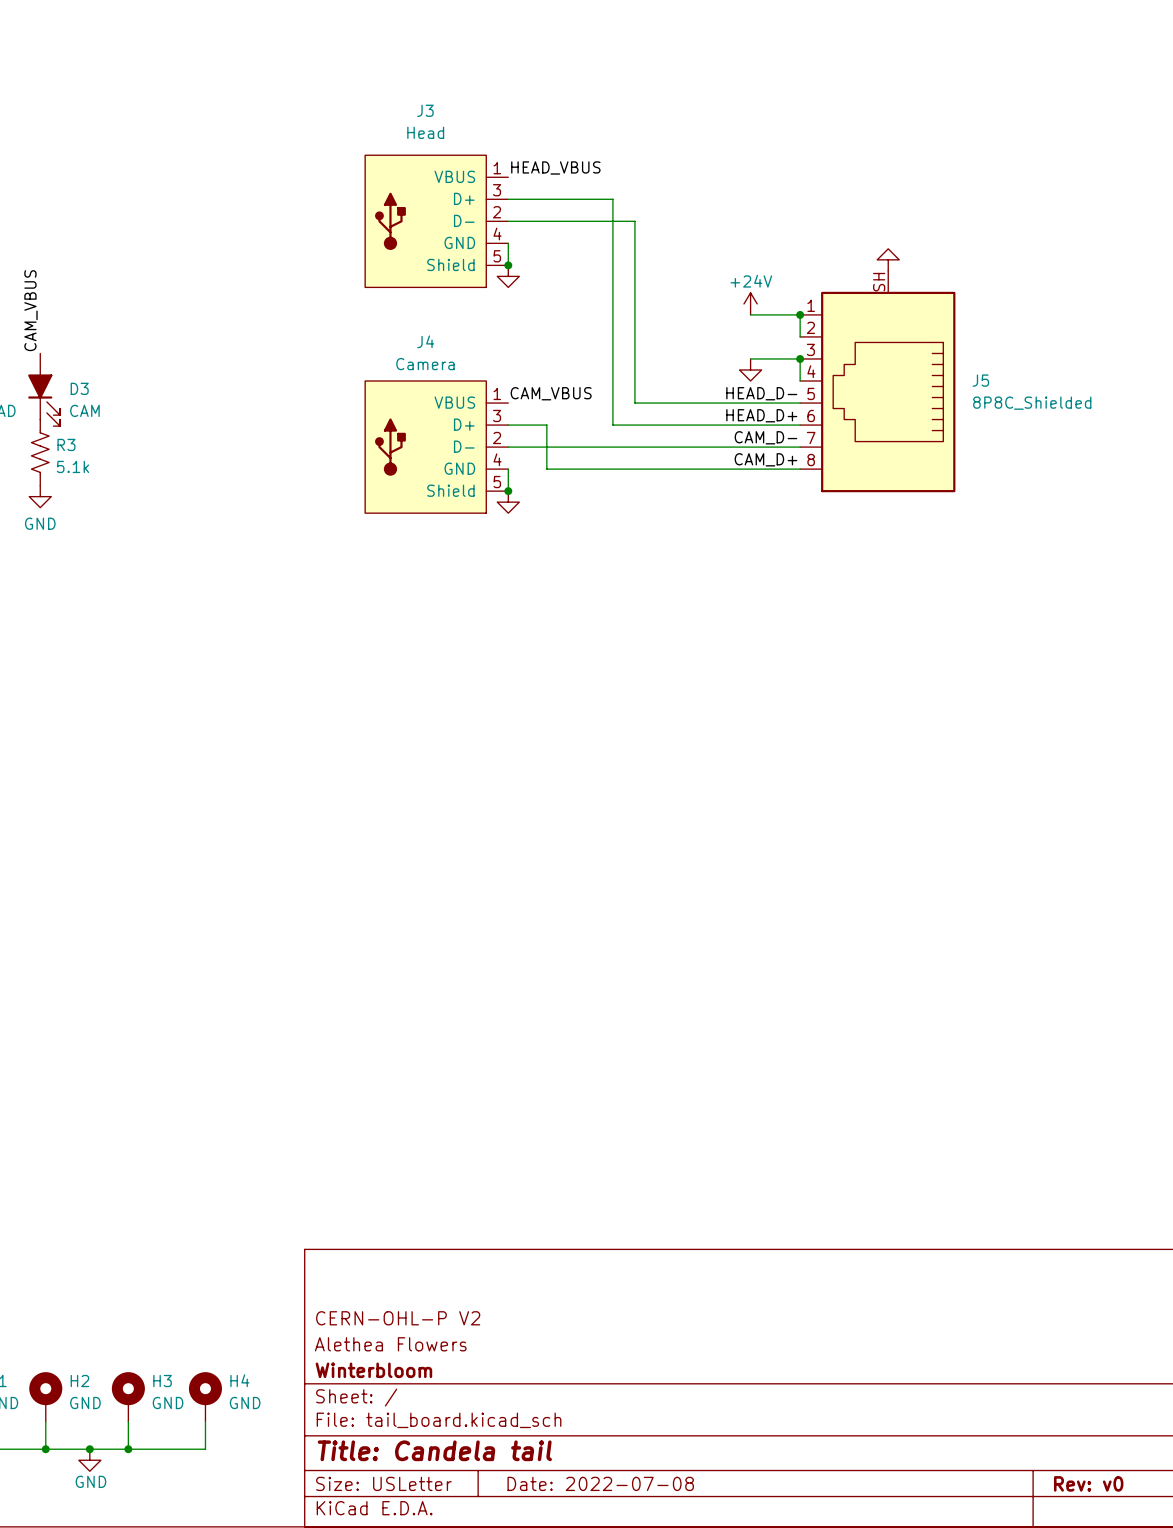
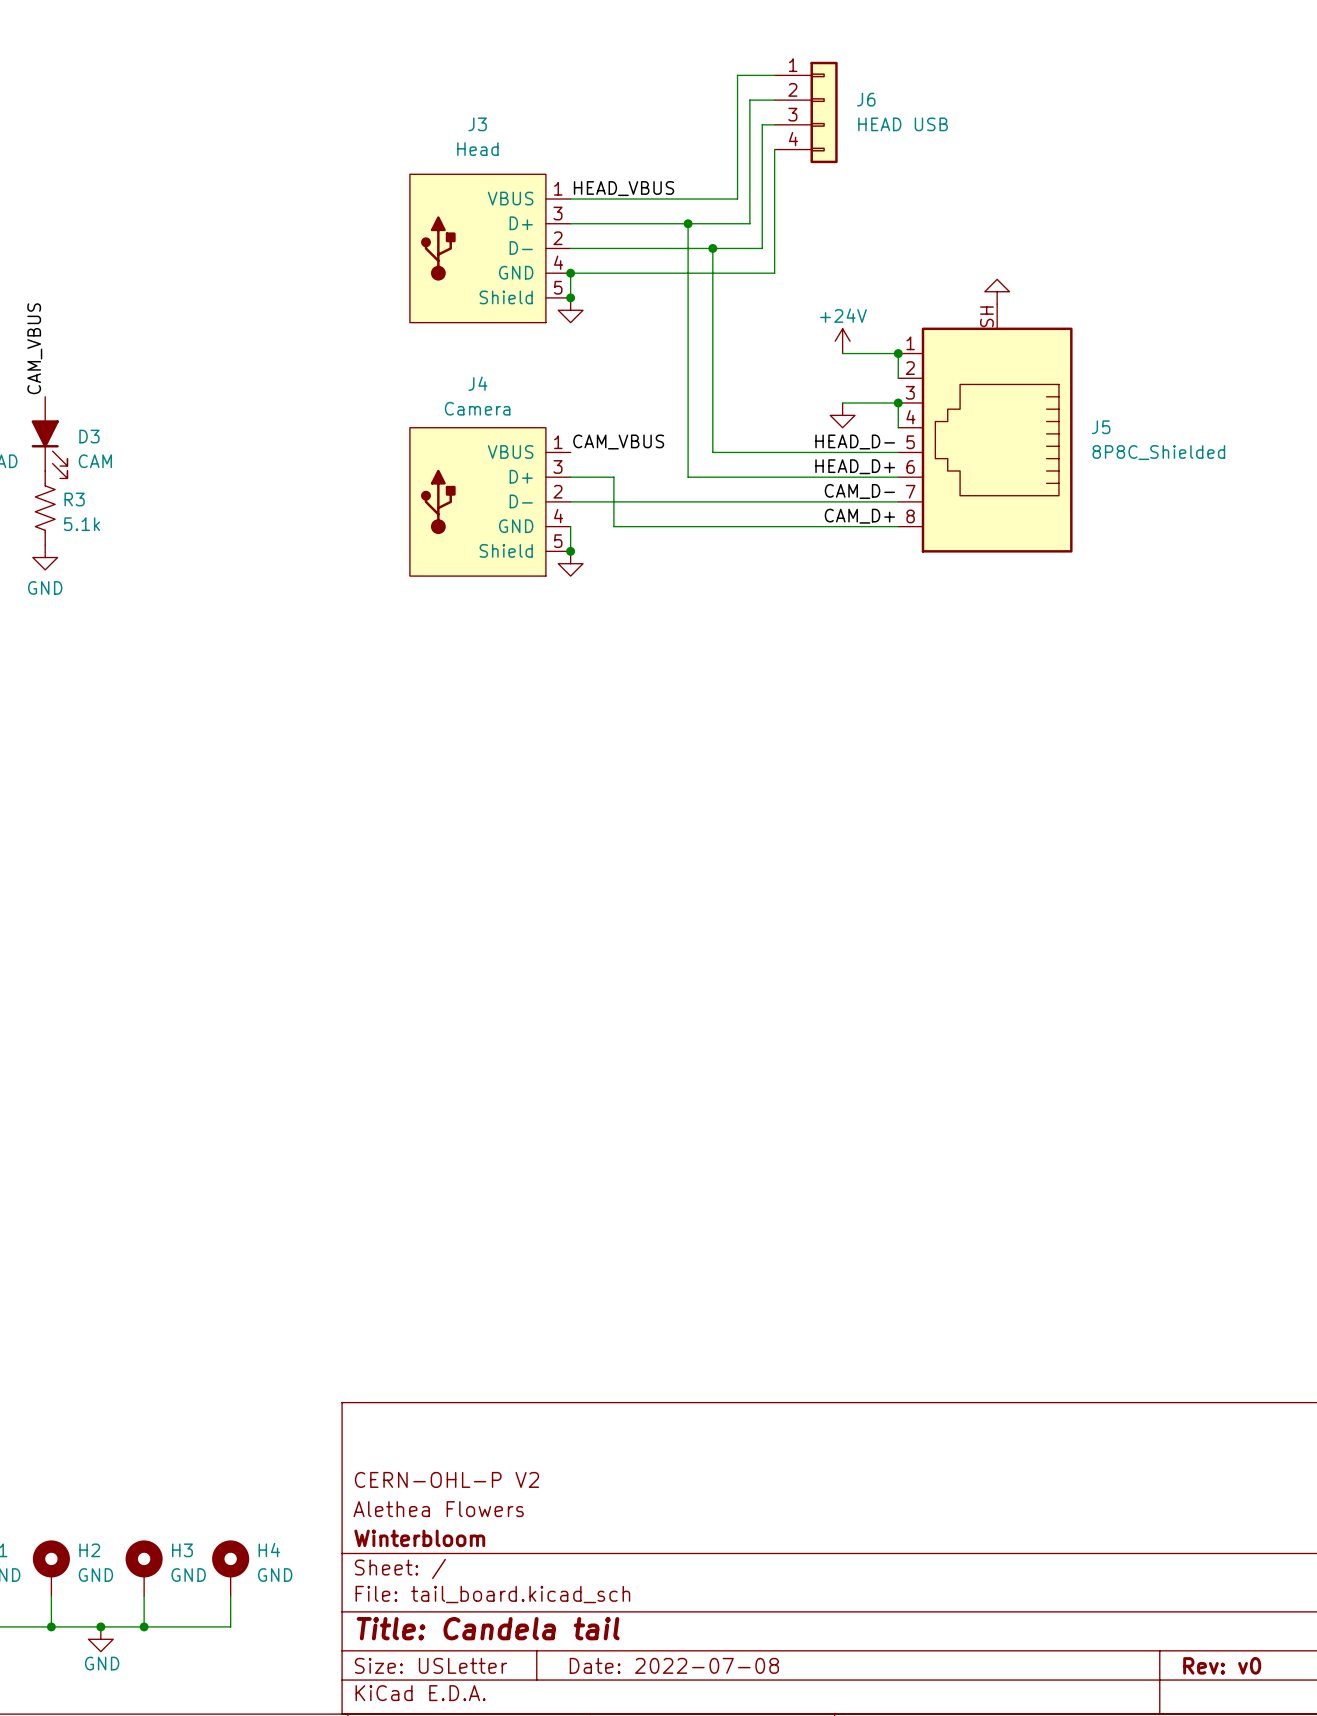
wire: none -> (774, 75) (737, 75) (737, 199) (570, 199)
wire: none -> (774, 100) (749, 100) (749, 223) (688, 223)
J6: none -> HEAD USB (806, 112)
wire: none -> (774, 124) (762, 124) (762, 248) (712, 248)
wire: none -> (774, 149) (774, 273) (570, 273)
junction: none -> (688, 223)
junction: none -> (712, 248)
junction: none -> (570, 273)

